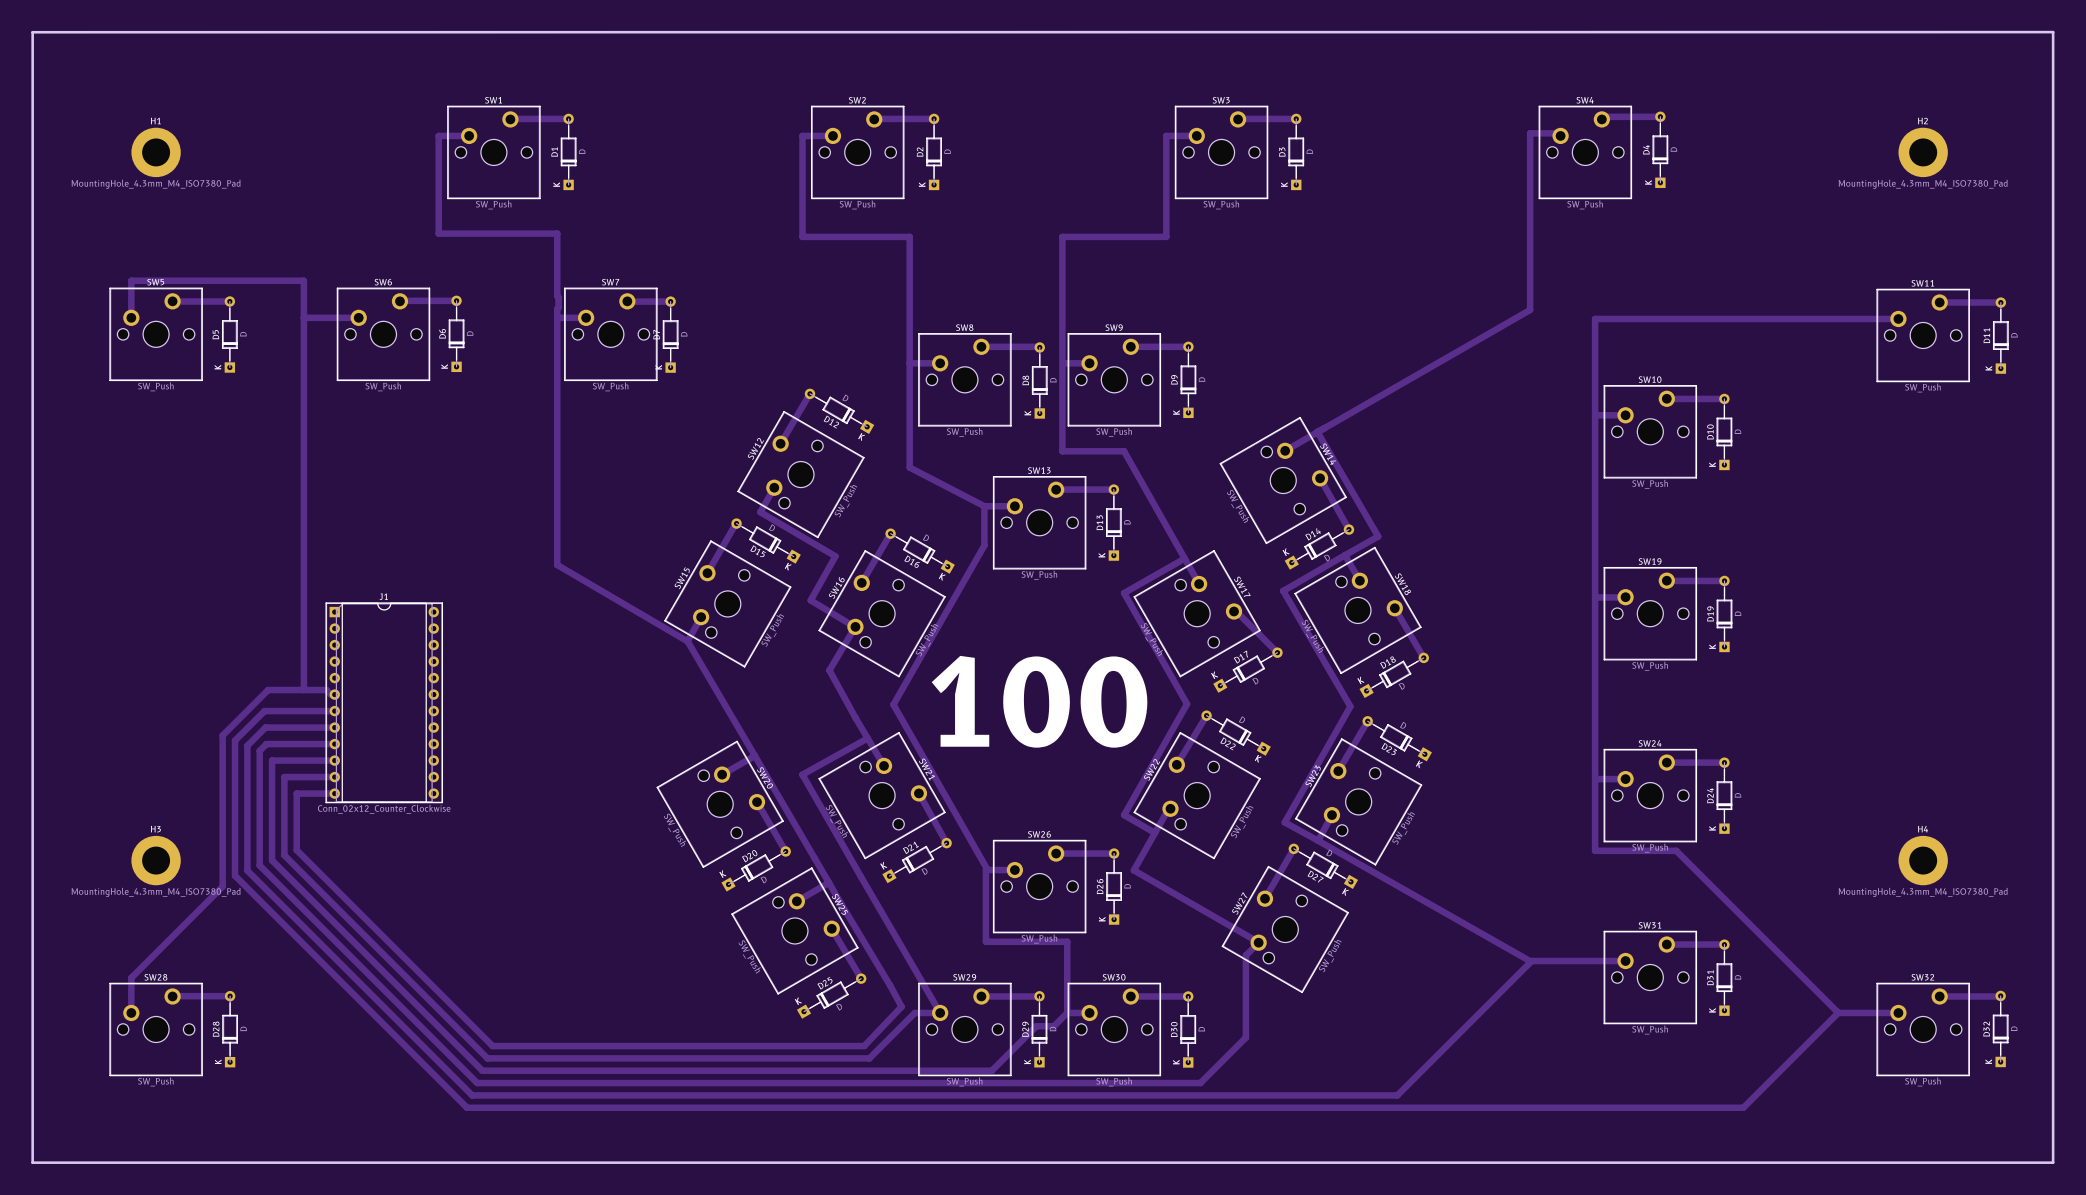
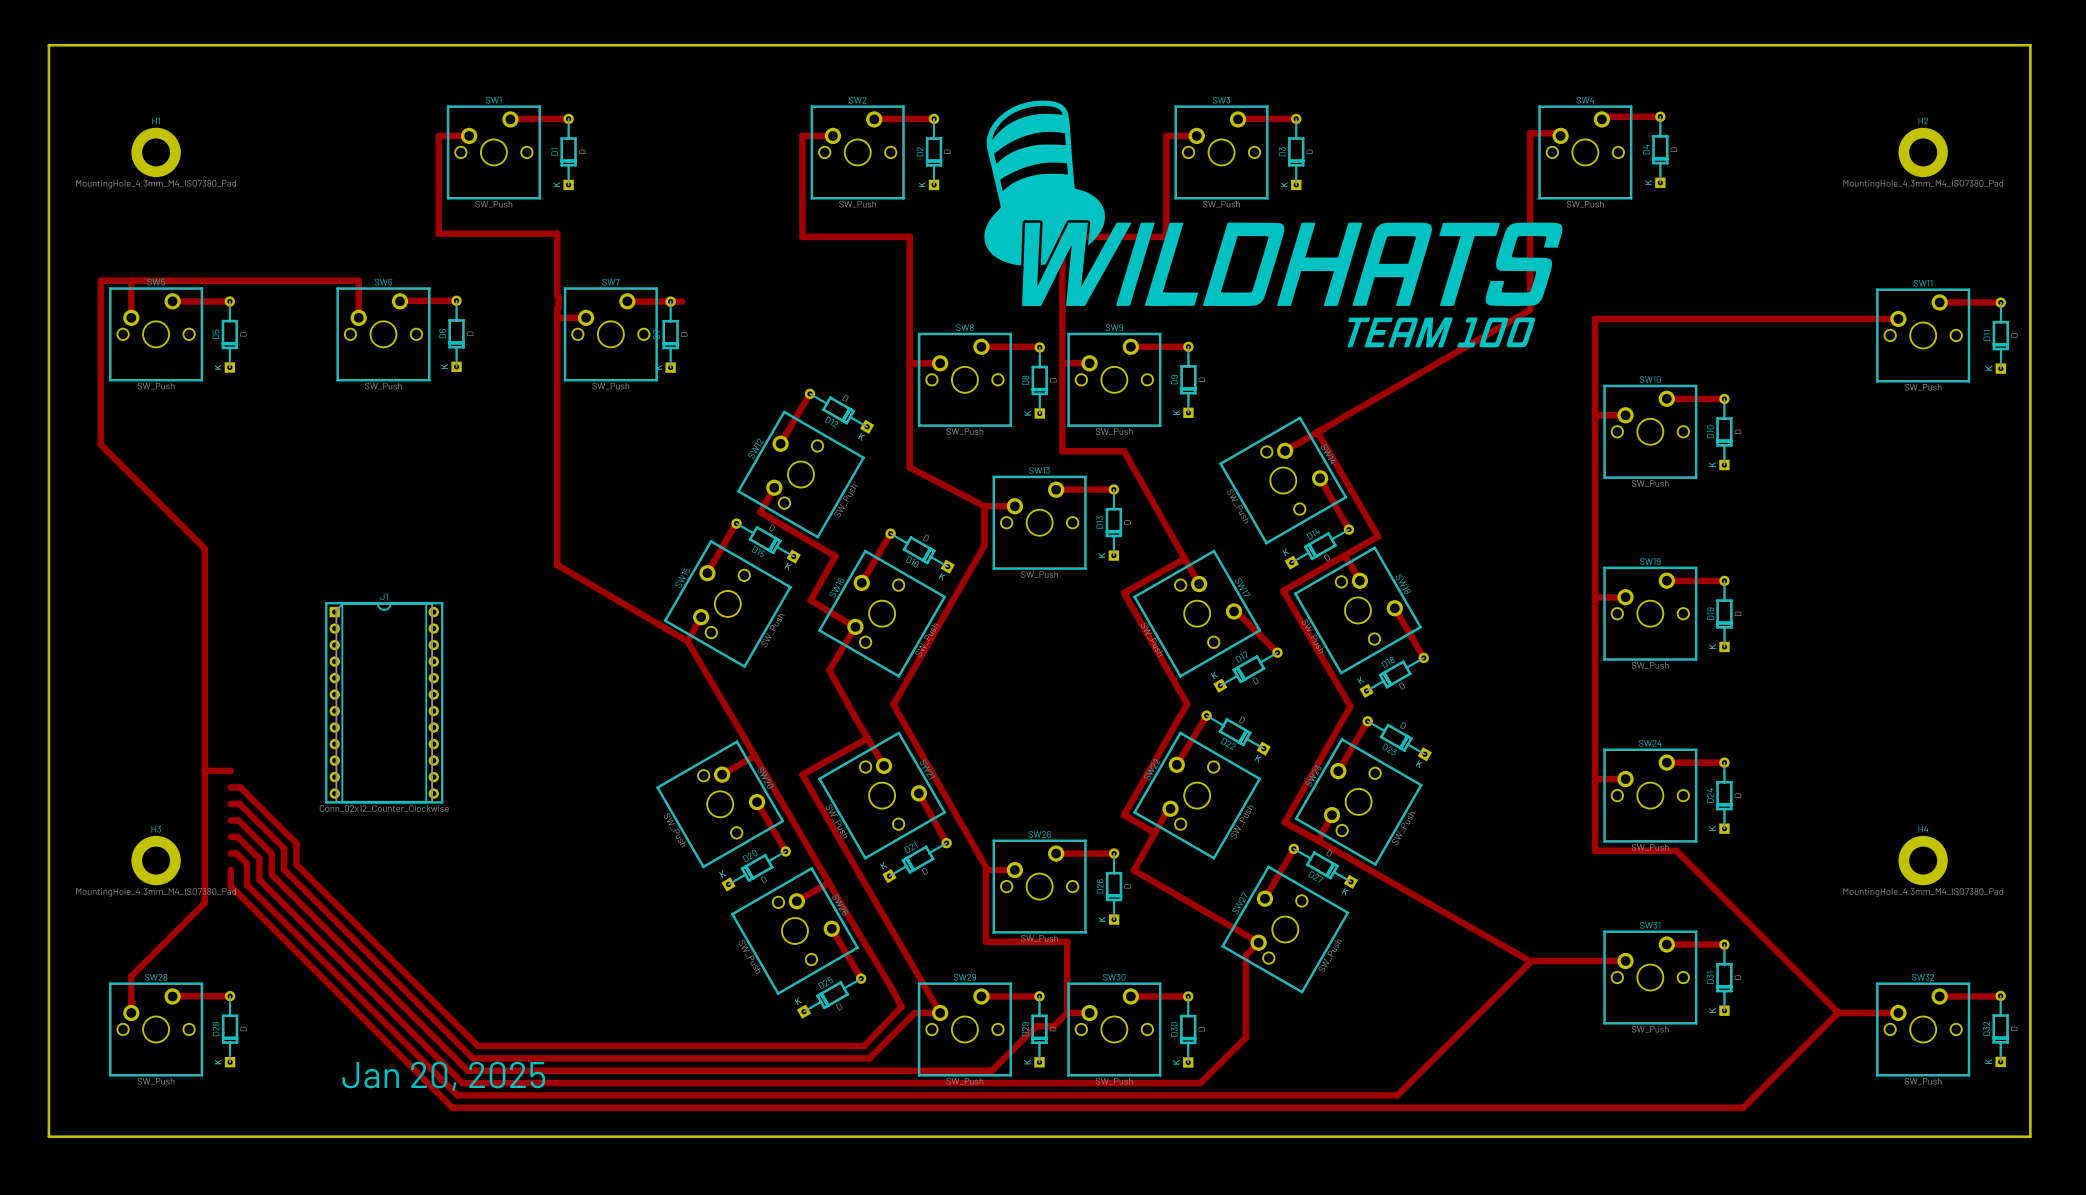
board edge: (2053, 32) (2053, 1162) (32, 1162) (32, 32) (2053, 32) -> (48, 45) (48, 1136) (2030, 1136) (2030, 45) (48, 45)
drawing: none -> [984, 100, 1563, 348]
track: none -> (131, 280) (100, 280) (100, 317)
track: (303, 280) (303, 690) -> none
track: none -> (670, 301) (682, 301)
track: (303, 317) (358, 317) -> (303, 280) (358, 280) (358, 317)
track: (334, 694) (331, 694) (326, 690) (268, 690) (222, 735) (222, 886) (131, 977) -> (100, 318) (100, 444) (204, 548) (204, 902) (131, 977)
text: 100 (1039, 701) -> none
track: (334, 711) (264, 711) (235, 740) (235, 875) (467, 1107) -> (230, 869) (230, 886) (452, 1107) (467, 1107)
track: (334, 727) (265, 727) (247, 745) (247, 870) (472, 1095) -> (230, 853) (236, 853) (247, 863) (247, 884) (457, 1095) (472, 1095)
track: (334, 744) (266, 744) (259, 750) (259, 865) (477, 1083) -> (230, 836) (237, 836) (259, 858) (259, 879) (462, 1083) (477, 1083)
track: (334, 760) (272, 760) (272, 860) (482, 1070) -> (230, 820) (238, 820) (271, 853) (271, 874) (467, 1070) (482, 1070)
track: none -> (204, 770) (230, 770)
track: (334, 777) (284, 777) (284, 855) (487, 1058) -> (230, 803) (239, 803) (284, 848) (284, 869) (472, 1058) (487, 1058)
track: (334, 793) (296, 793) (296, 850) (492, 1046) -> (230, 787) (240, 787) (296, 843) (296, 864) (478, 1046) (492, 1046)
text: none -> Jan 20, 2025 (443, 1076)

